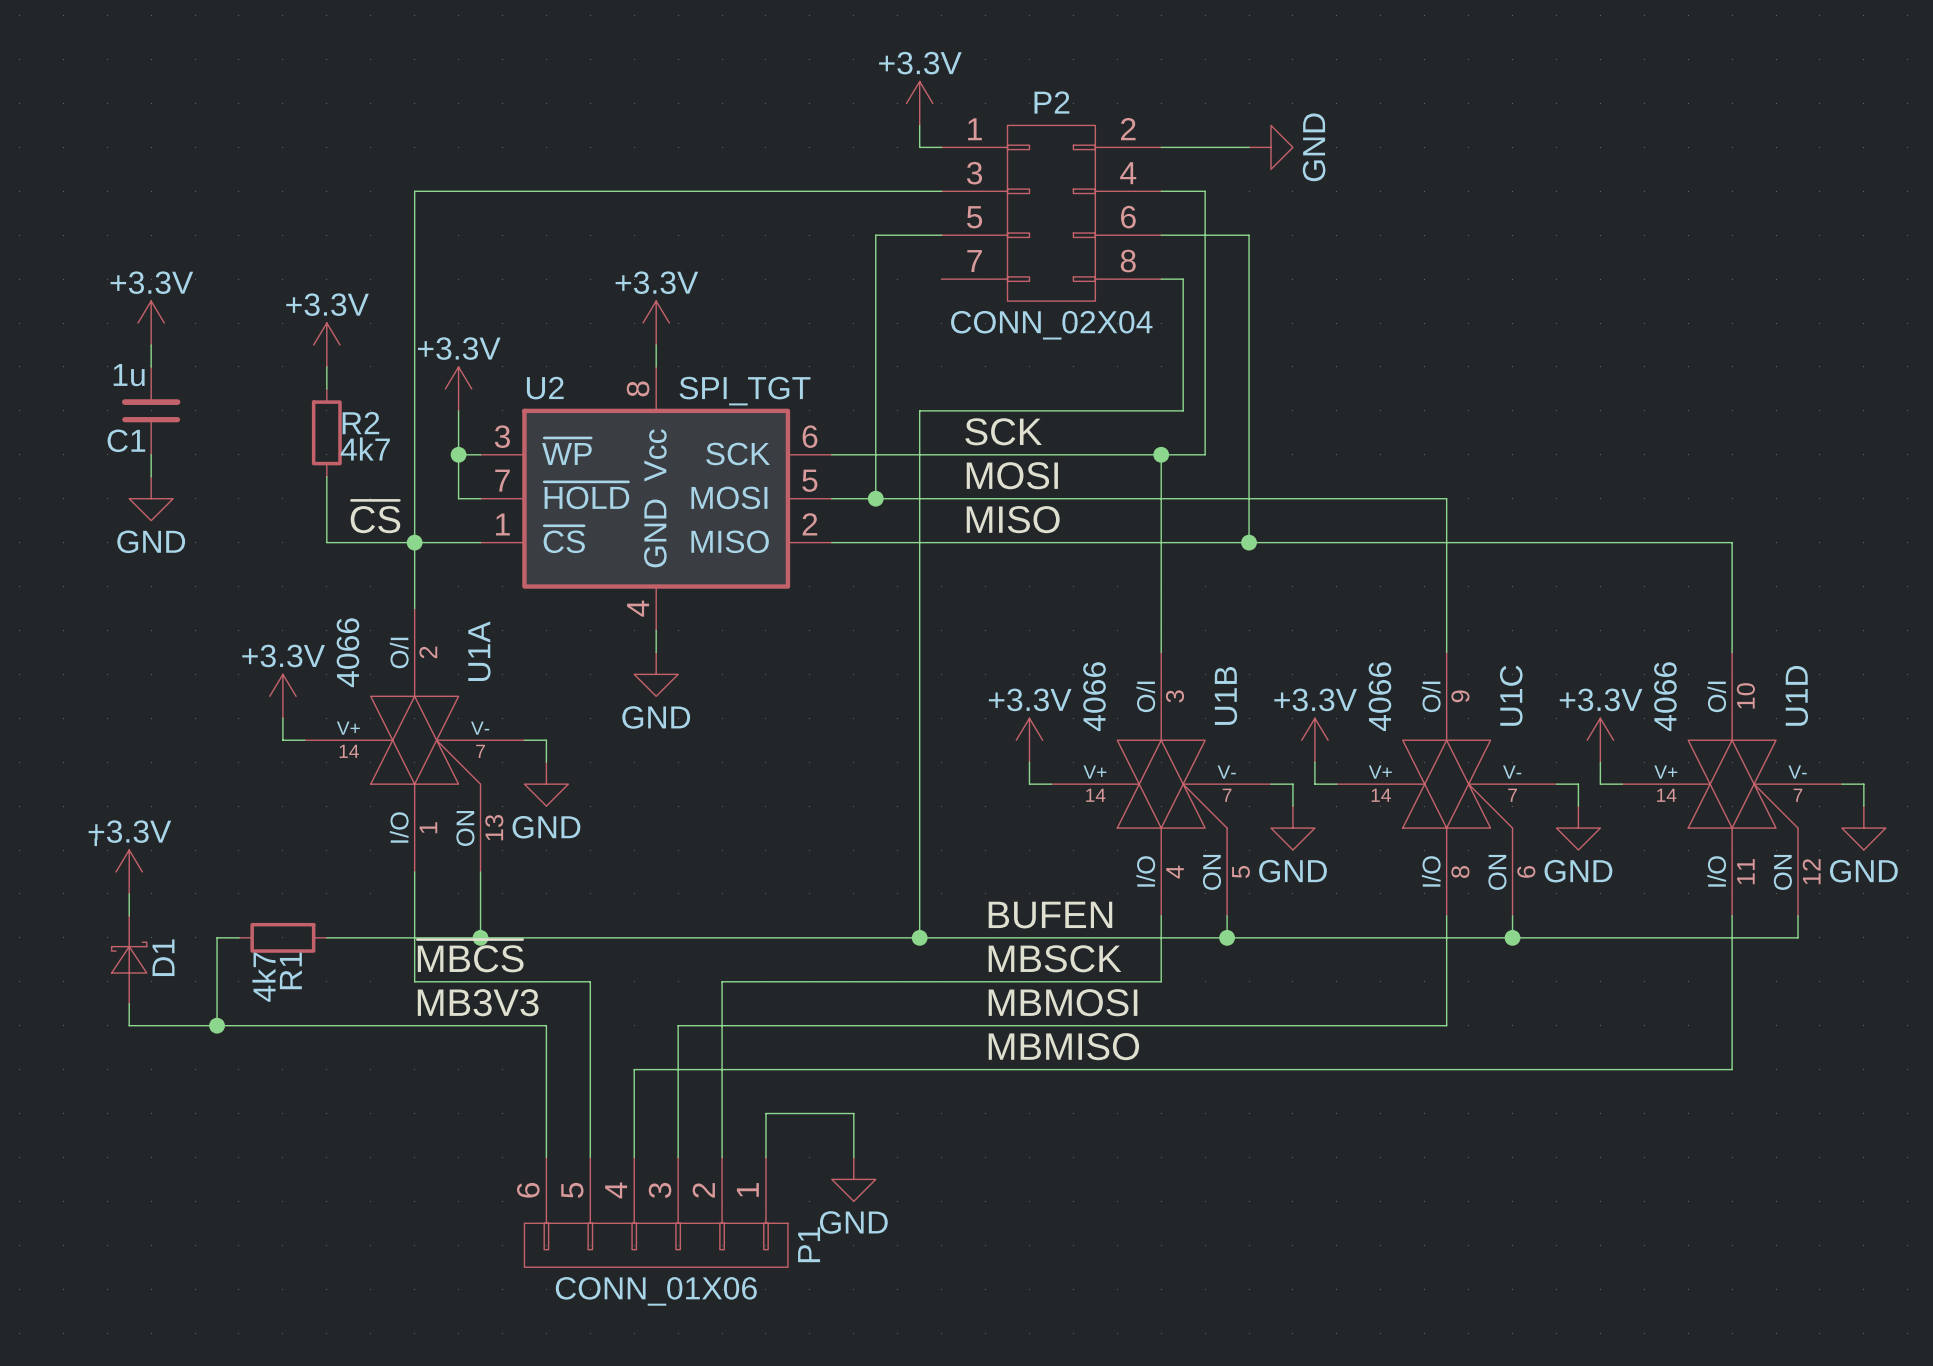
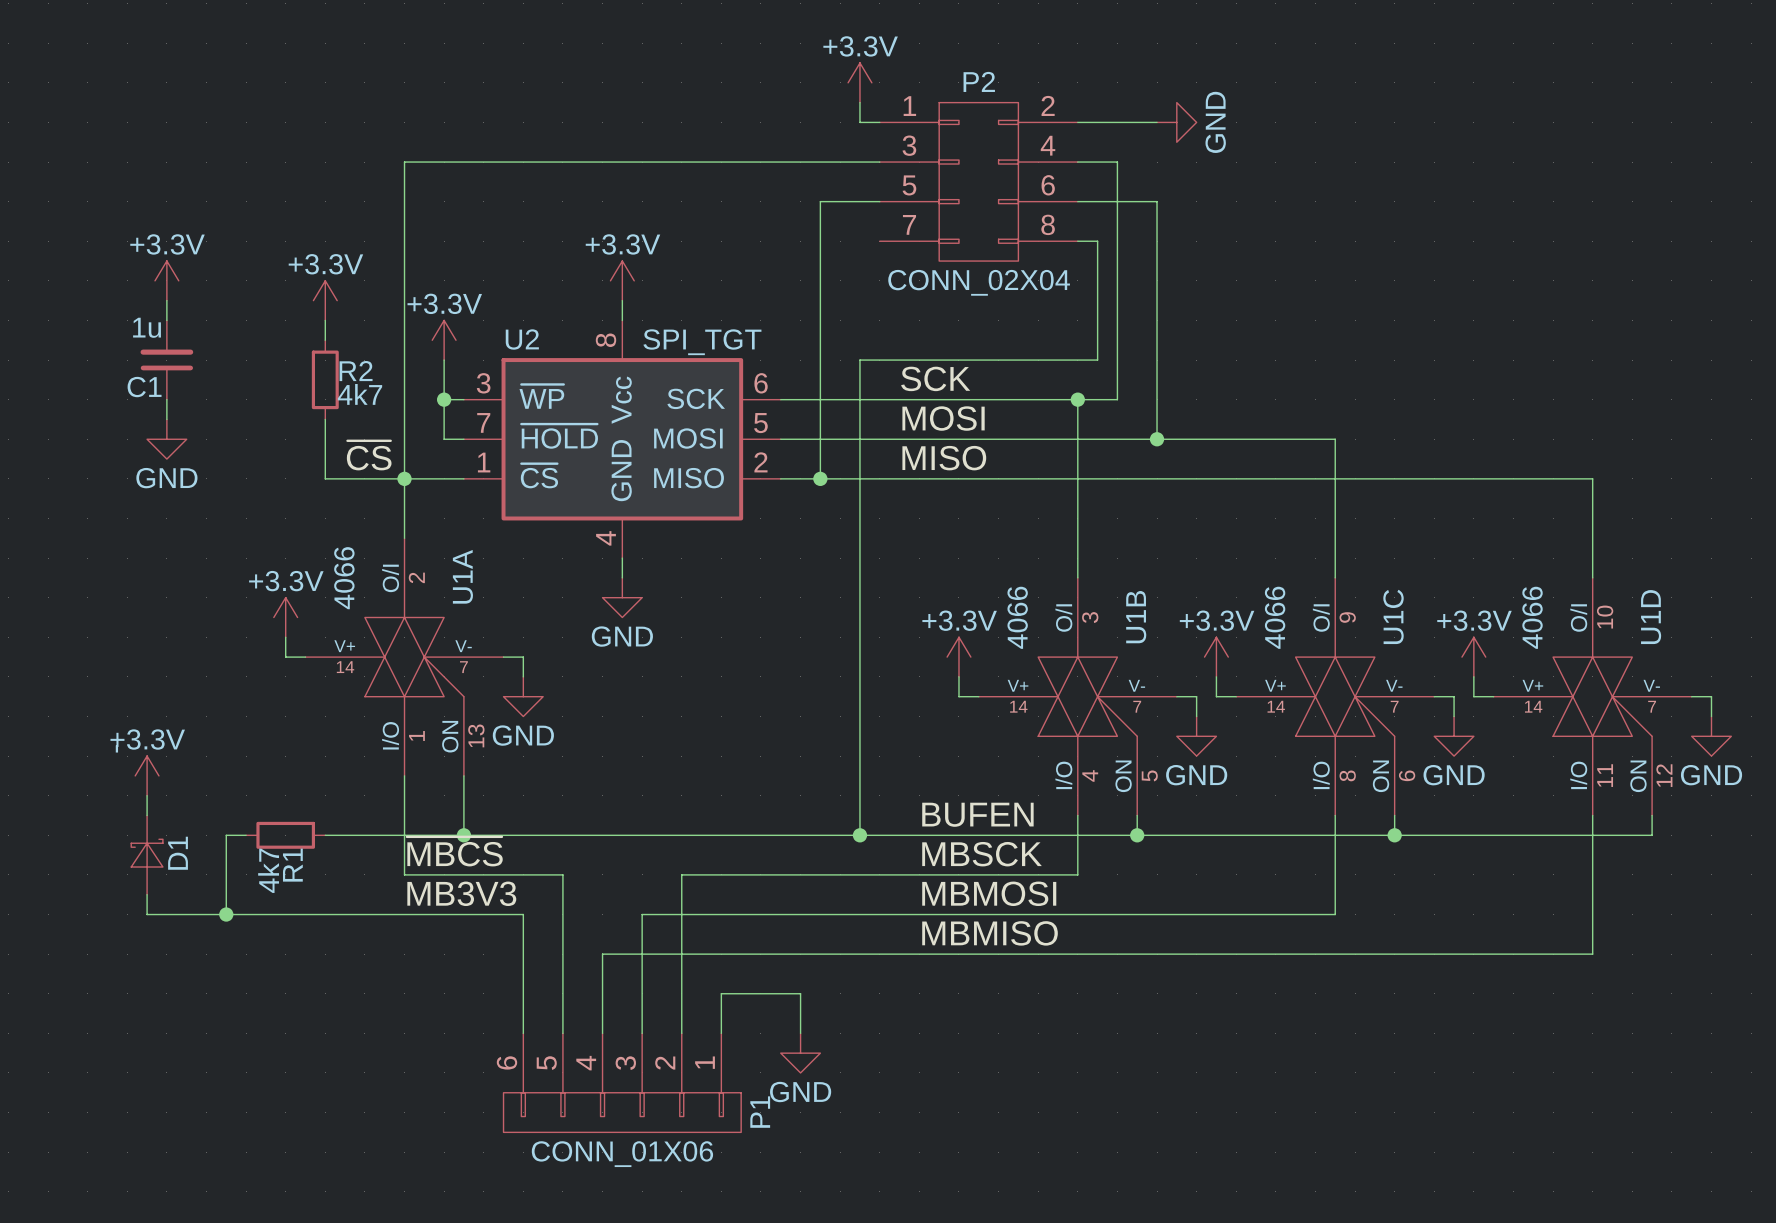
junction position: (875, 498) -> (820, 478)
wire: (1249, 498) (1249, 542) -> (820, 439) (820, 478)
junction position: (1249, 542) -> (1157, 439)

